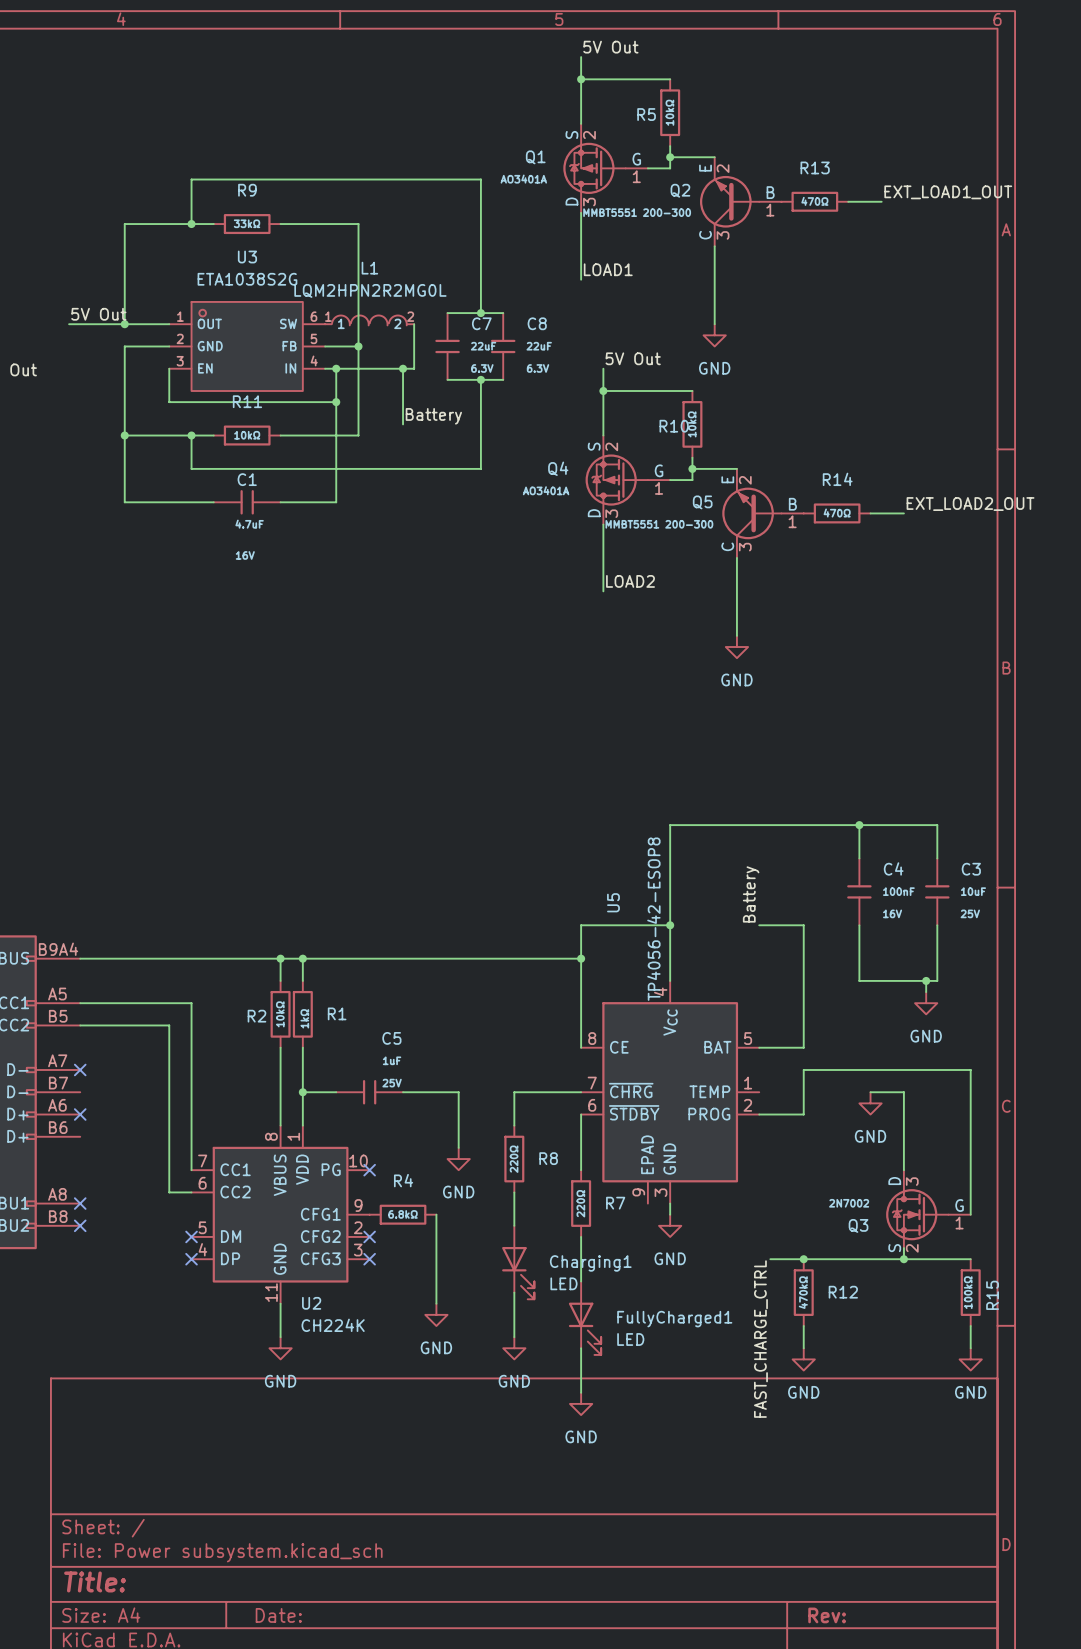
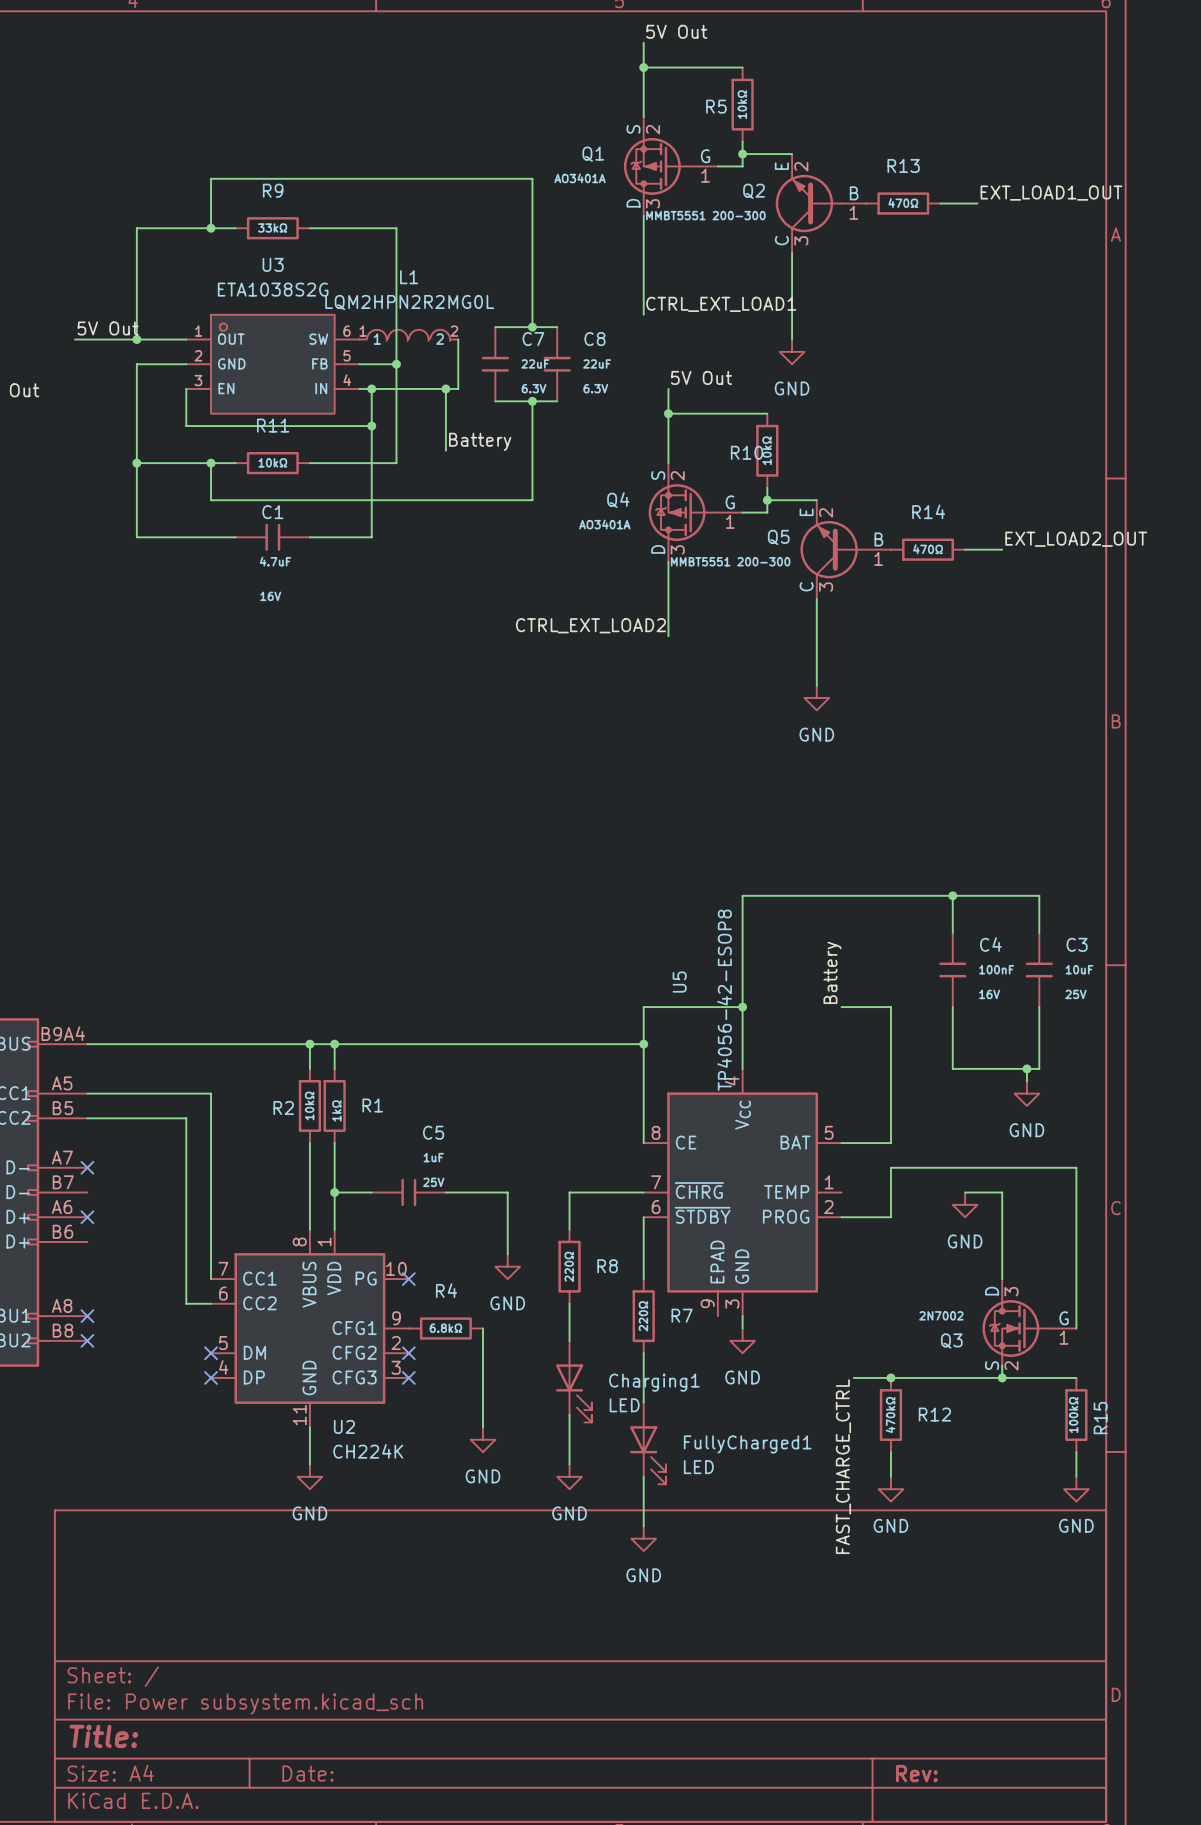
label: LOAD1 (608, 269) -> none
wire: none -> (643, 290) (643, 314)
label: none -> CTRL_EXT_LOAD1 (721, 304)
label: LOAD2 (630, 581) -> CTRL_EXT_LOAD2 (590, 625)

